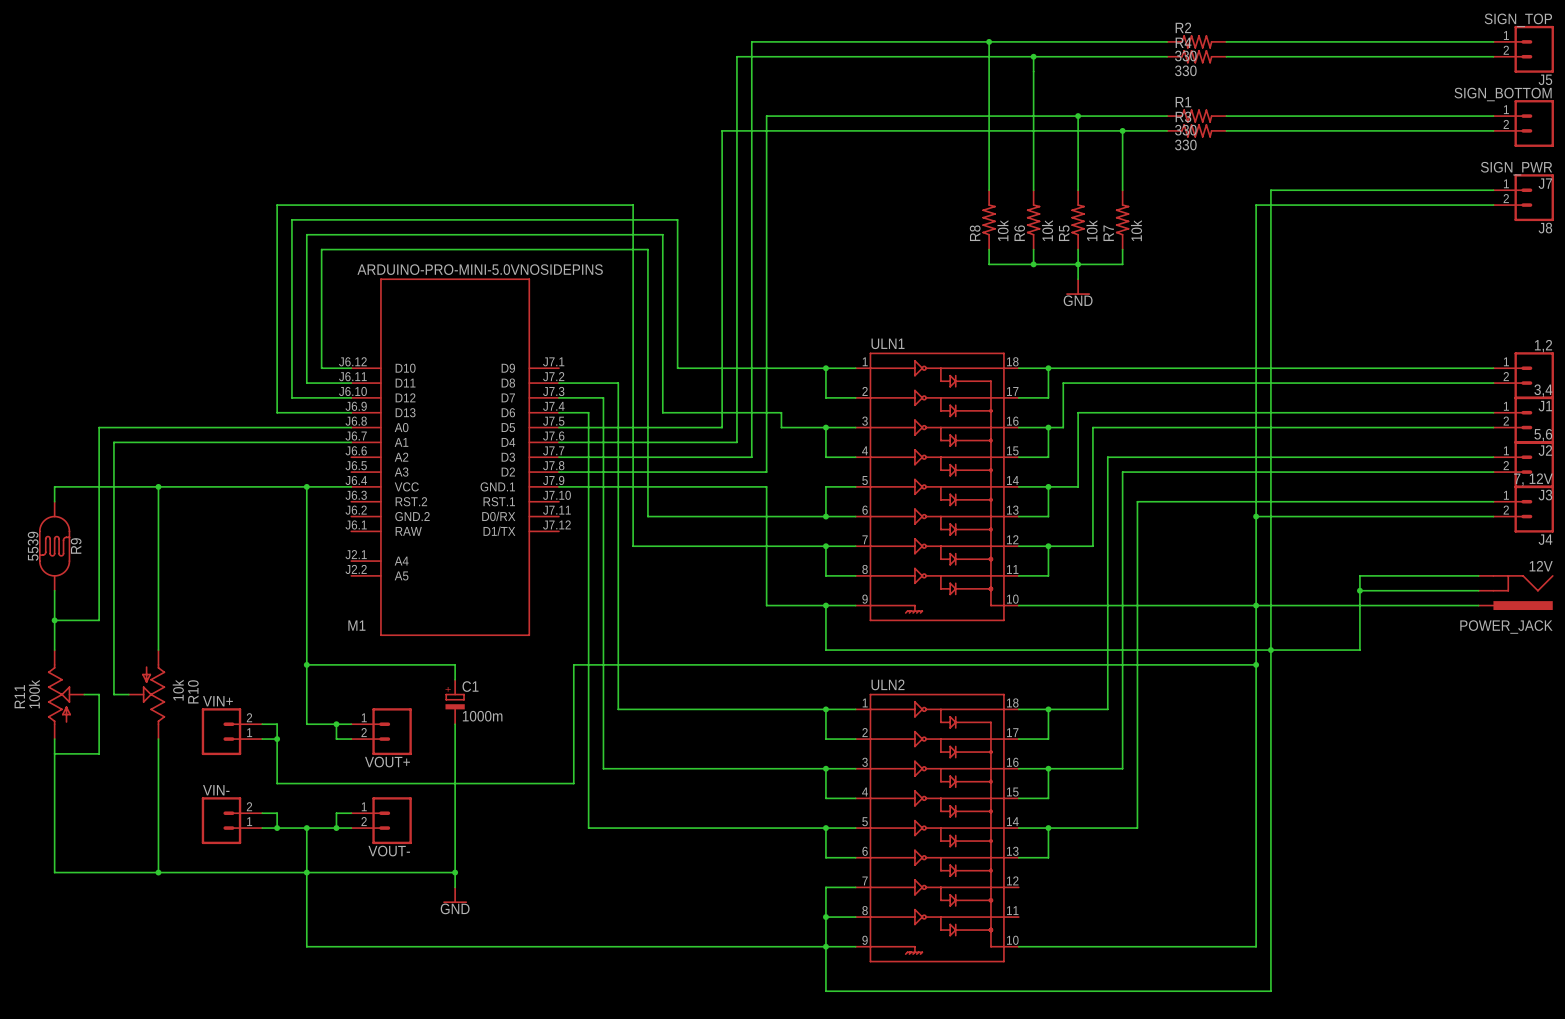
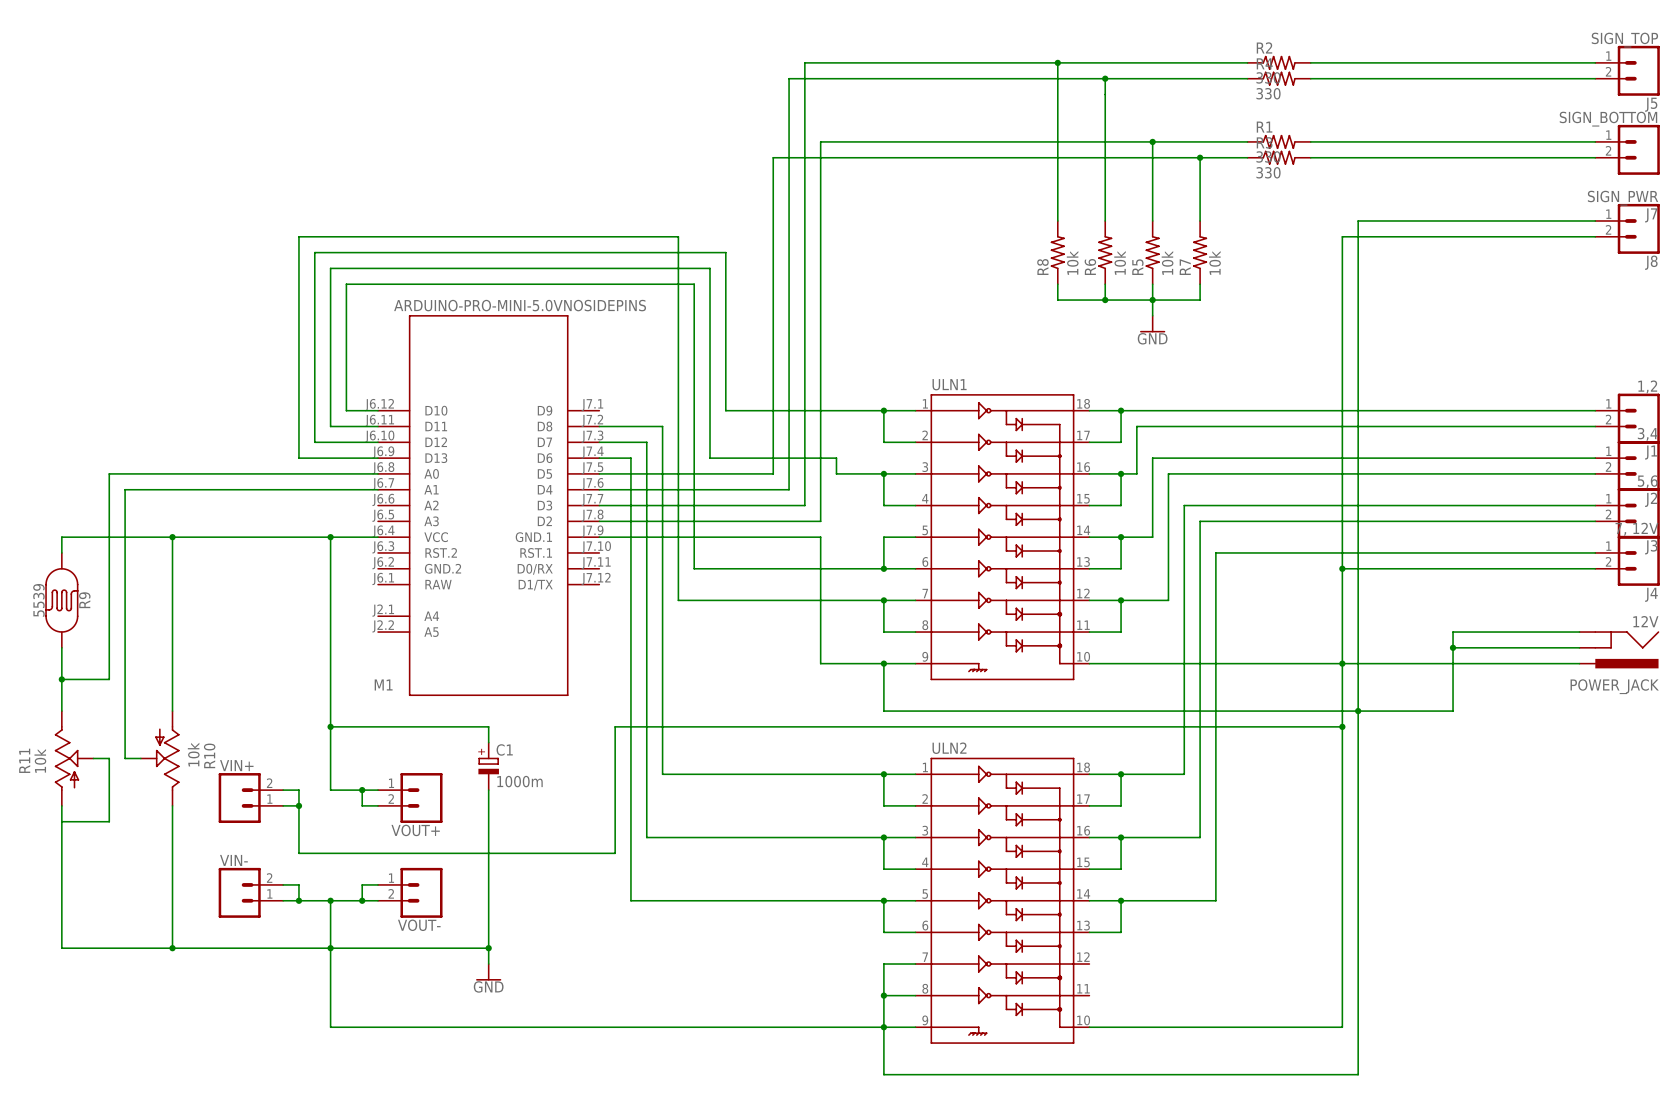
R11 value: 100k (34, 694) -> 10k (40, 760)

